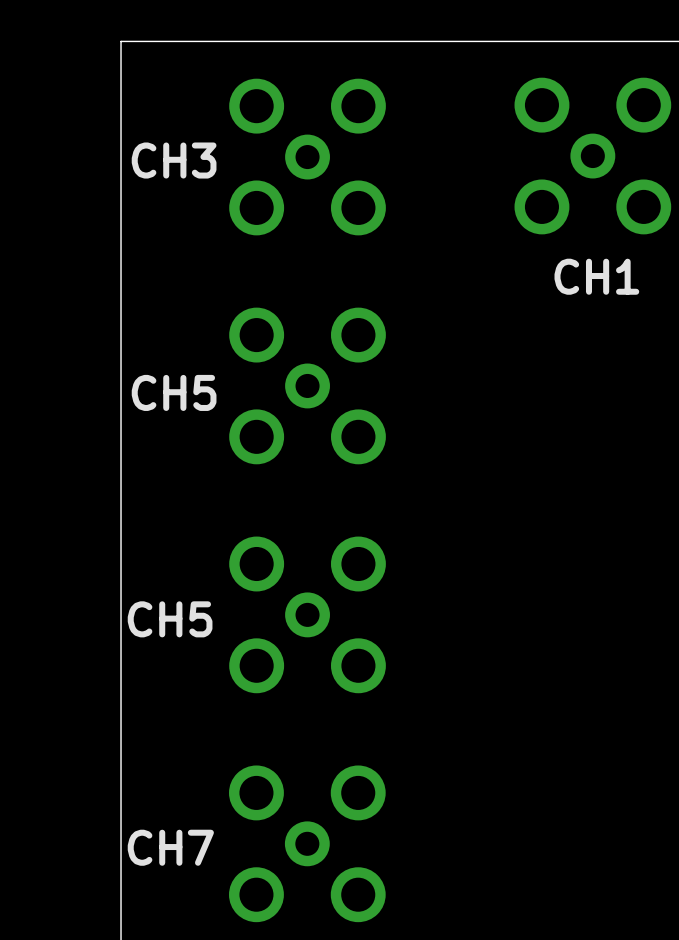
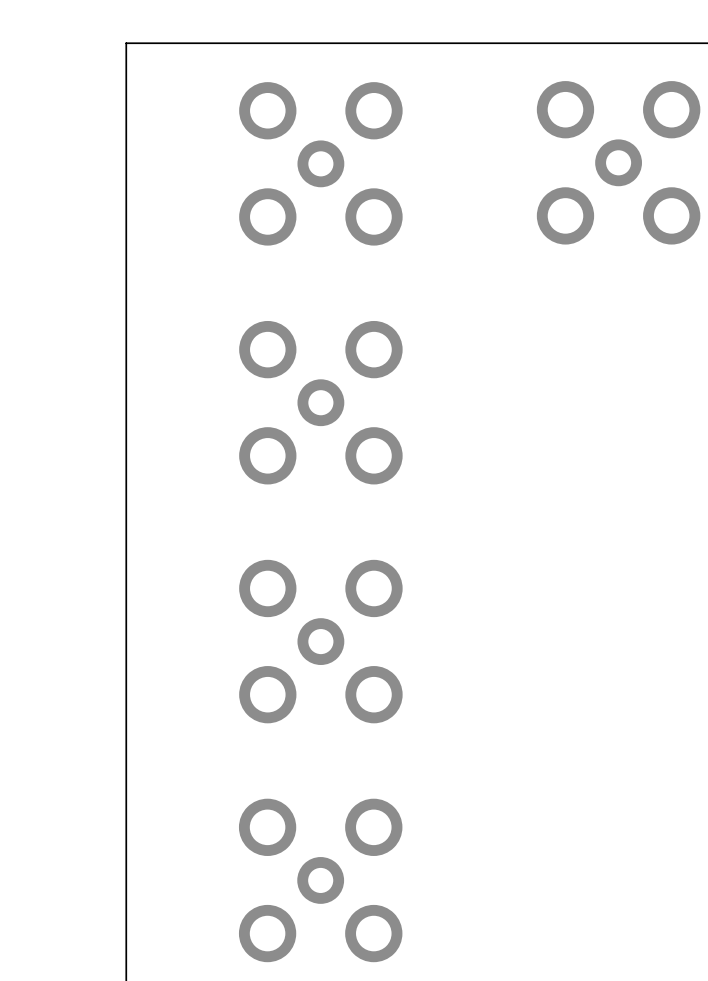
text: CH3 (174, 160) -> none
text: CH1 (596, 276) -> none
text: CH5 (174, 392) -> none
text: CH5 (170, 619) -> none
text: CH7 (170, 847) -> none

